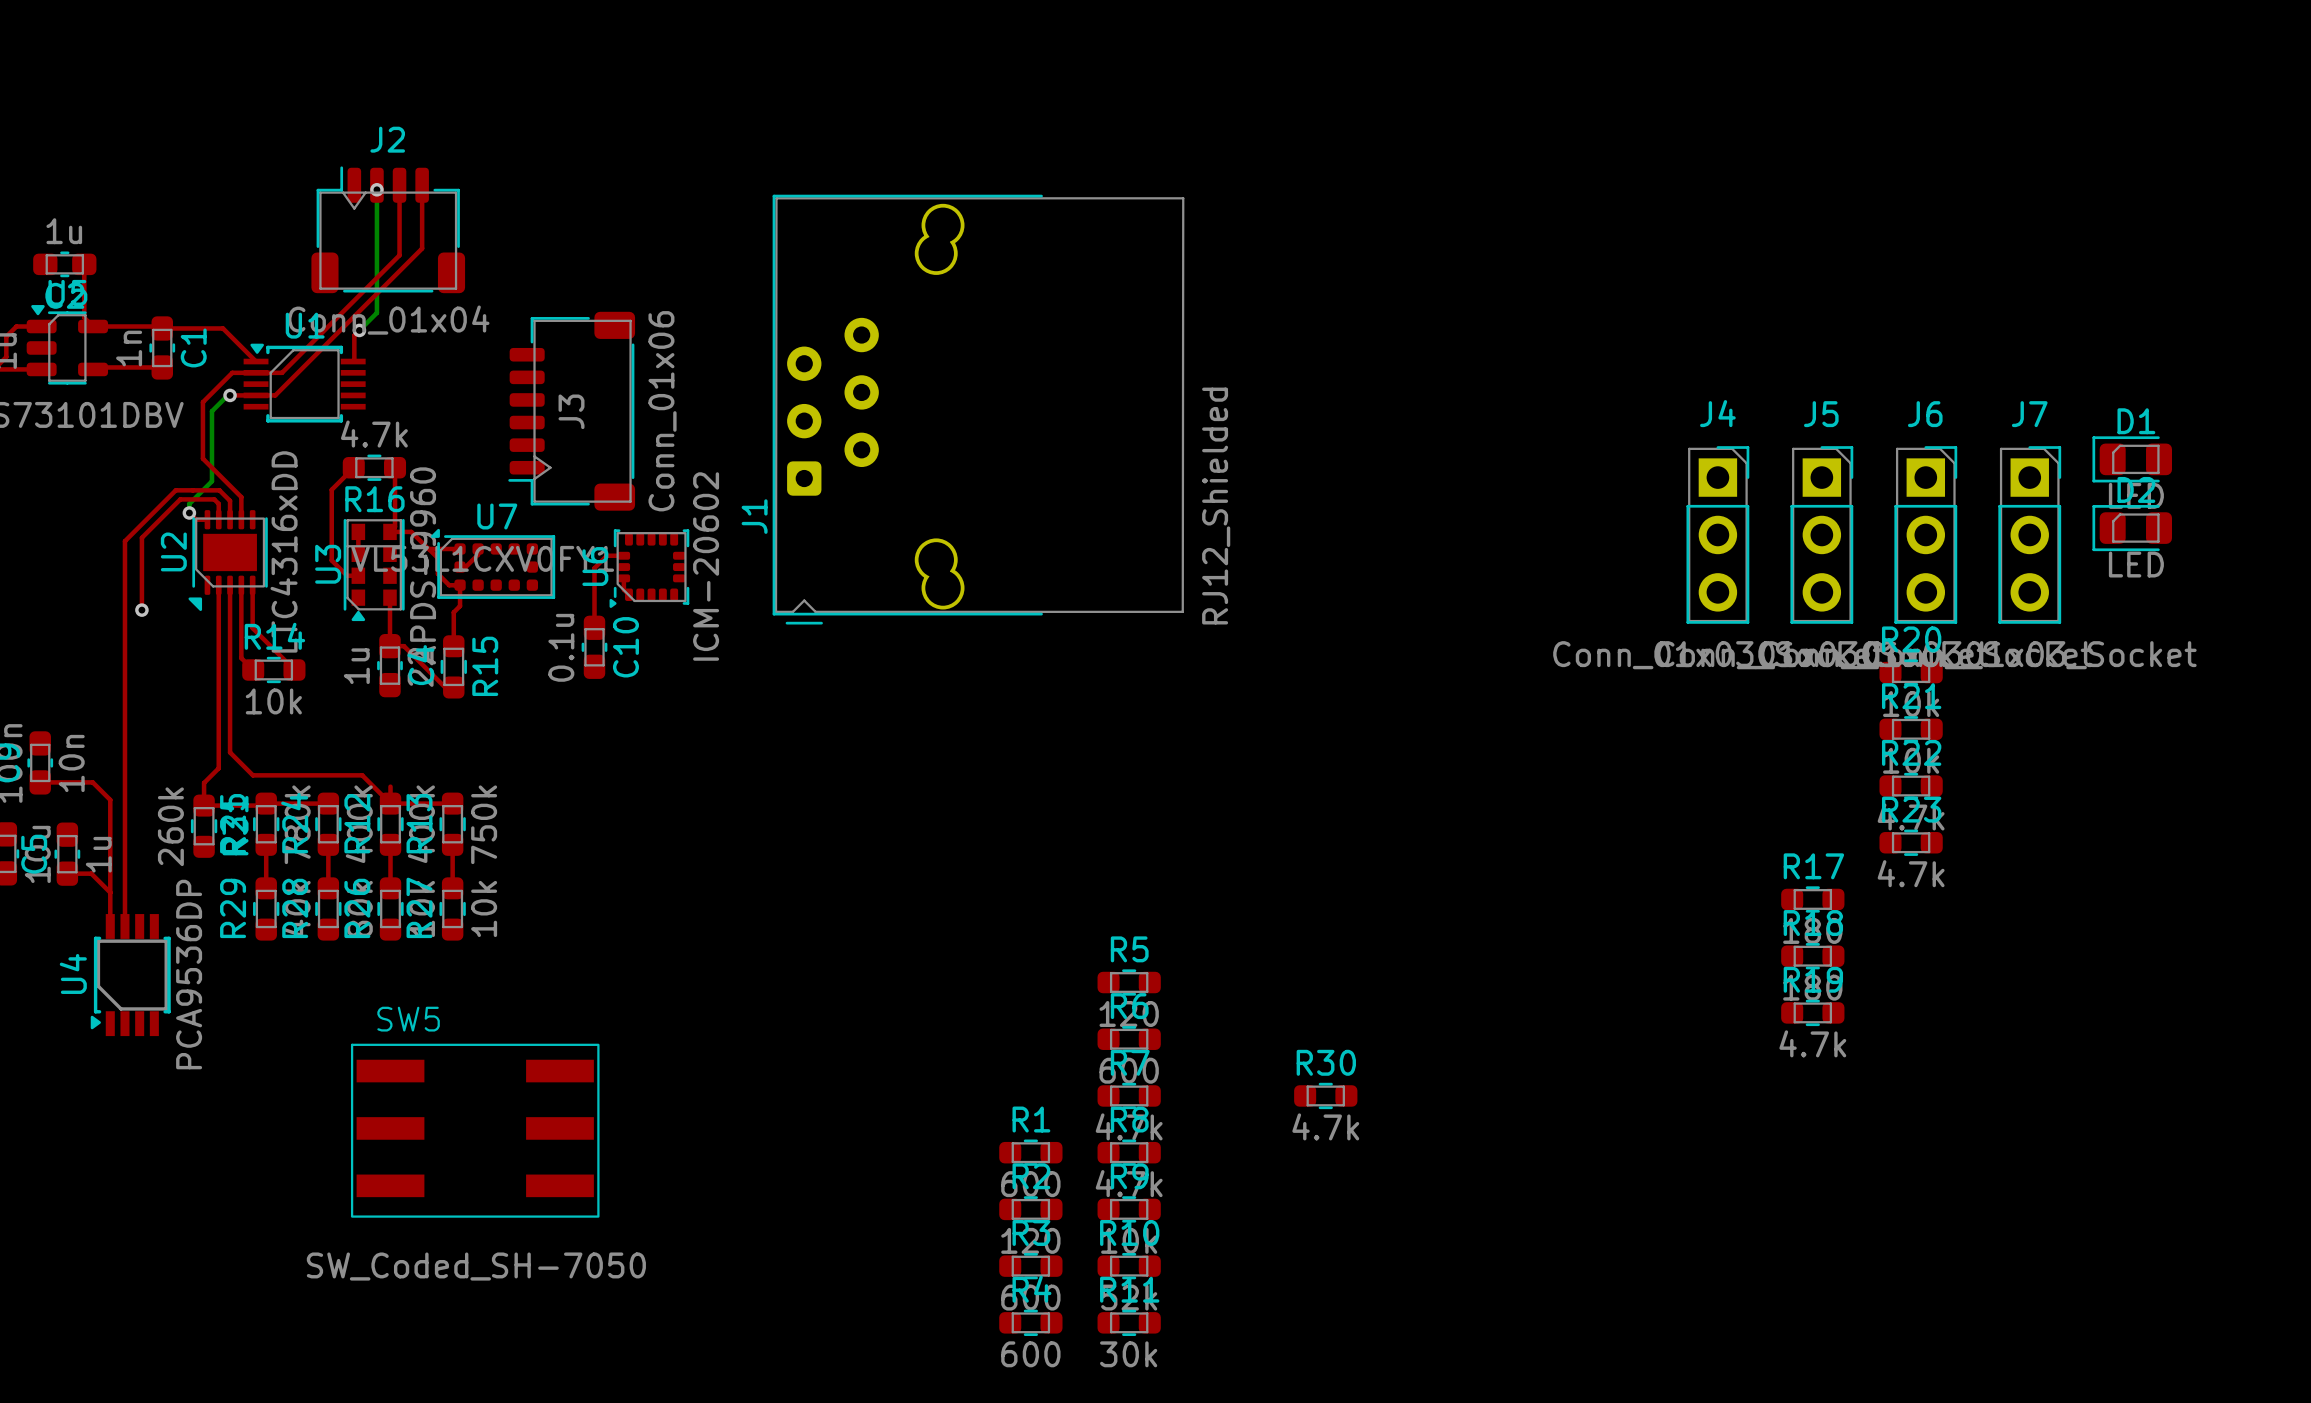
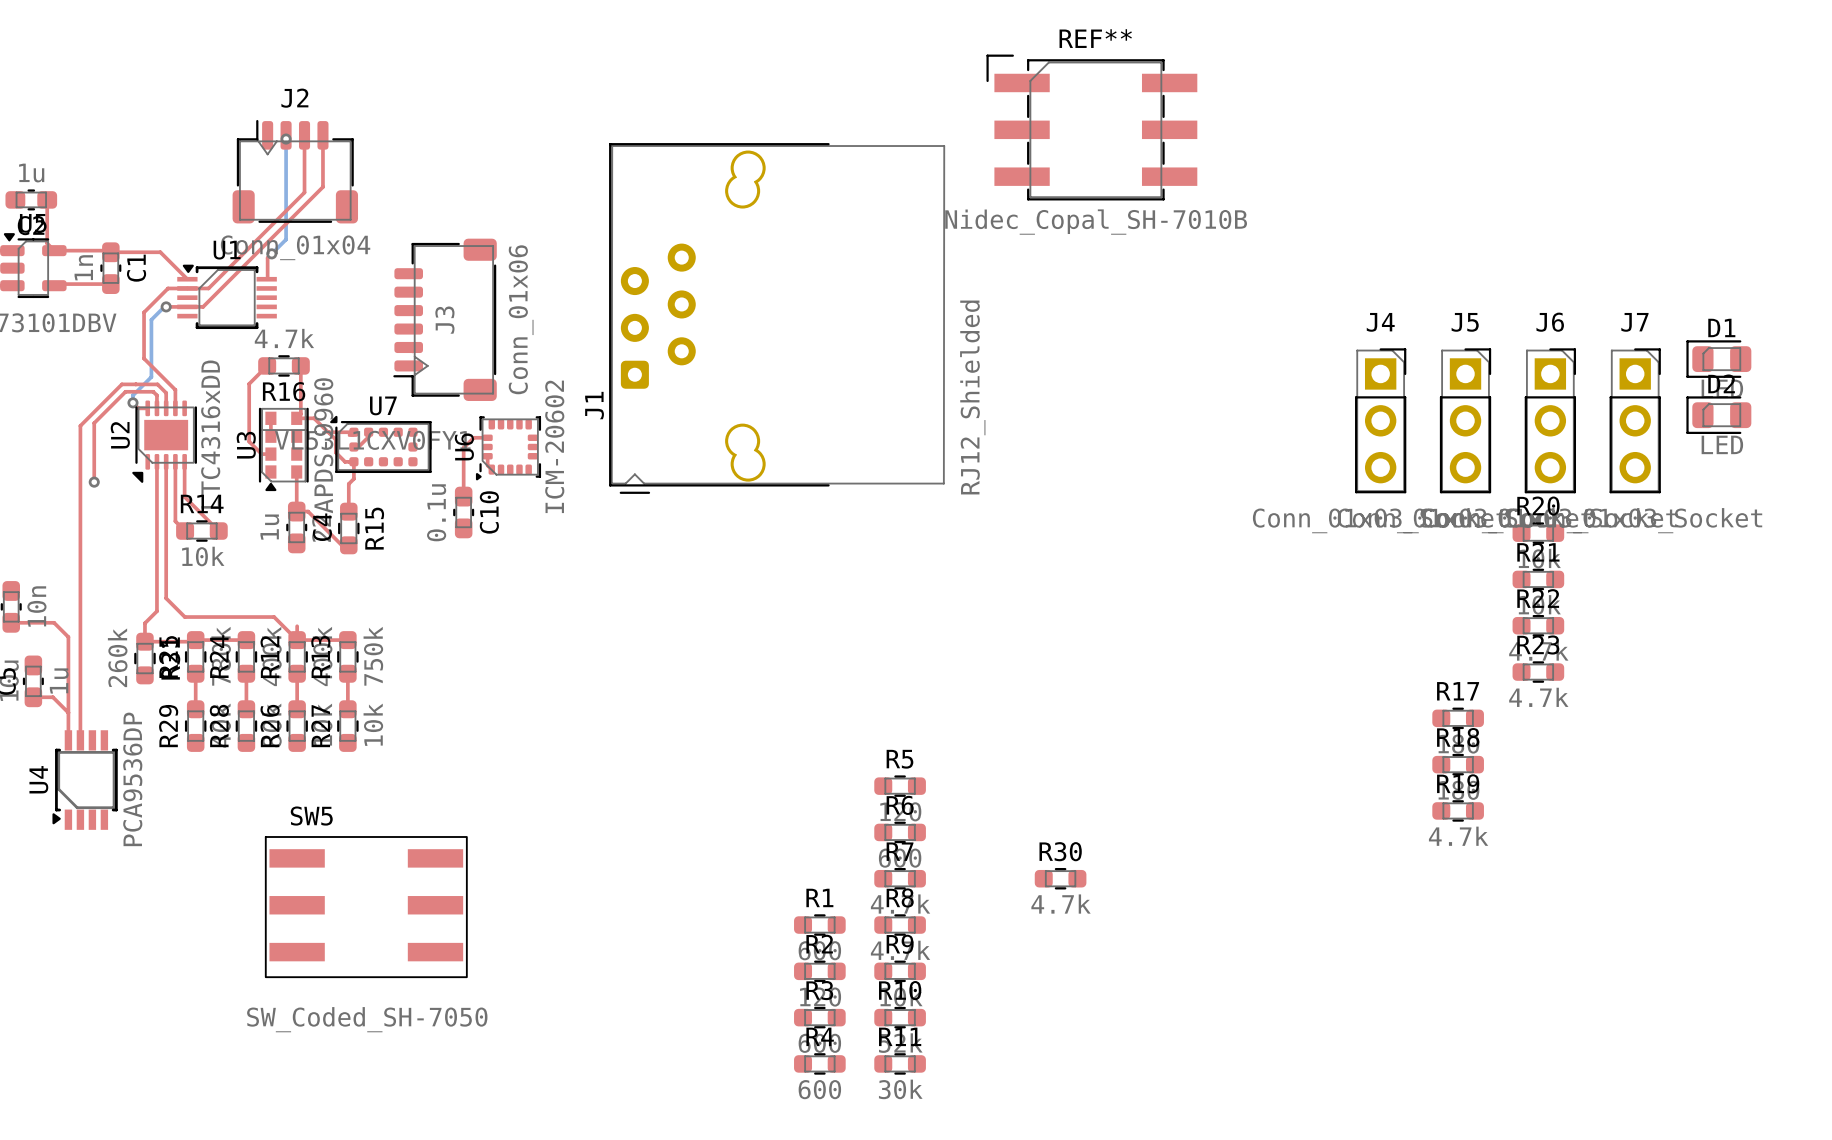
REF**: none -> Nidec_Copal_SH-7010B (1091, 127)

